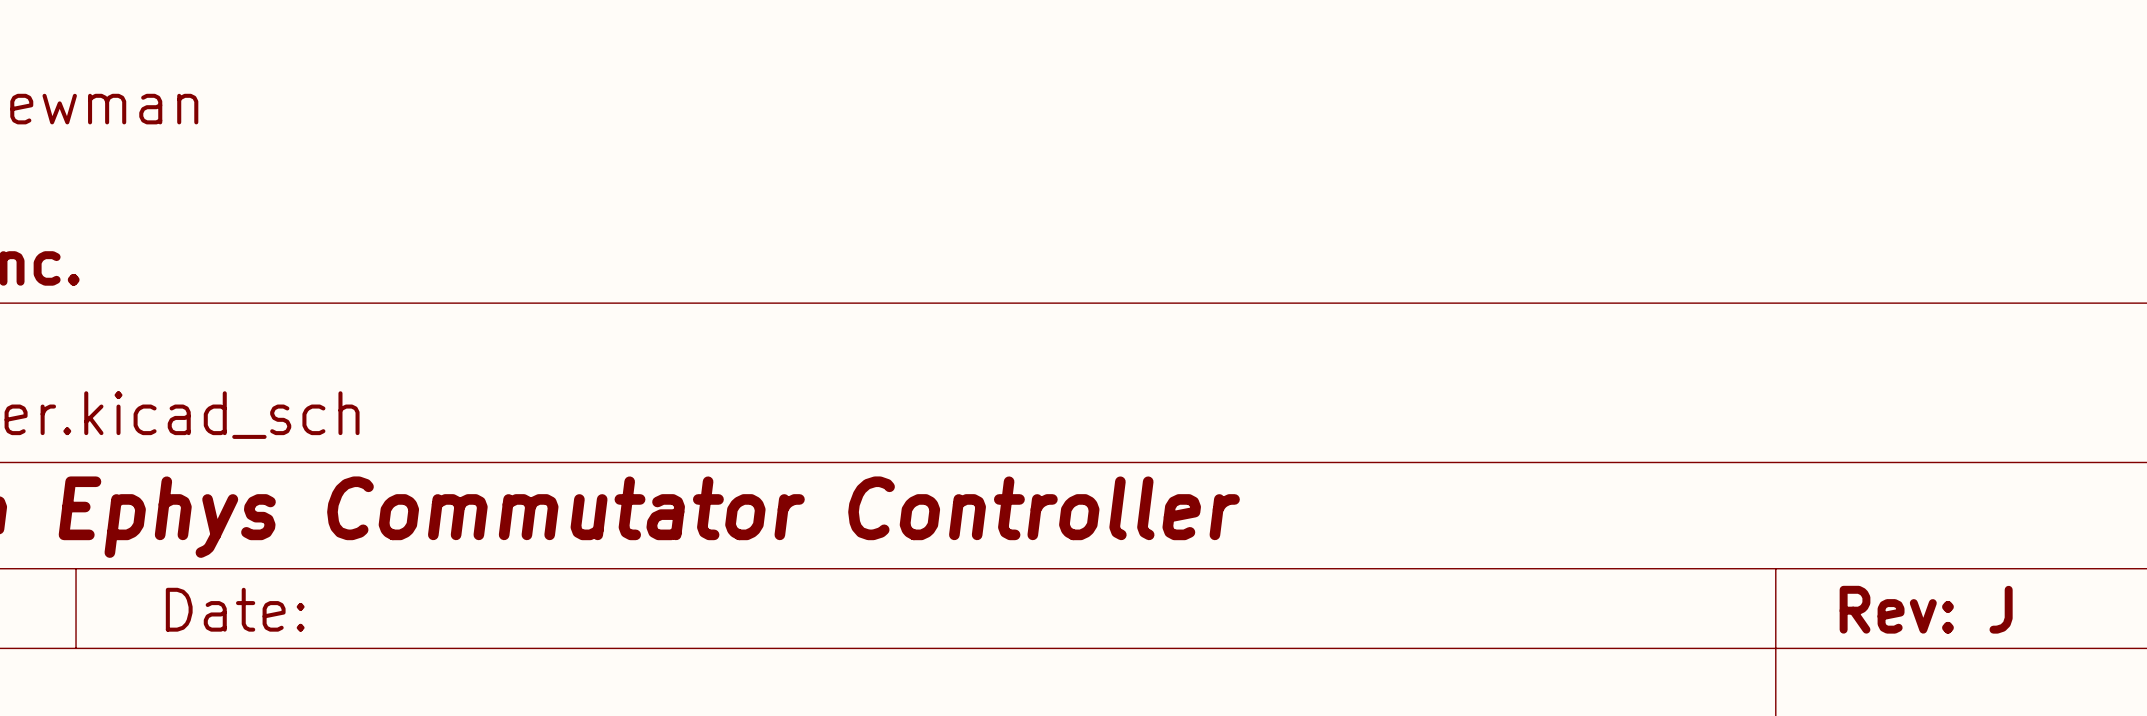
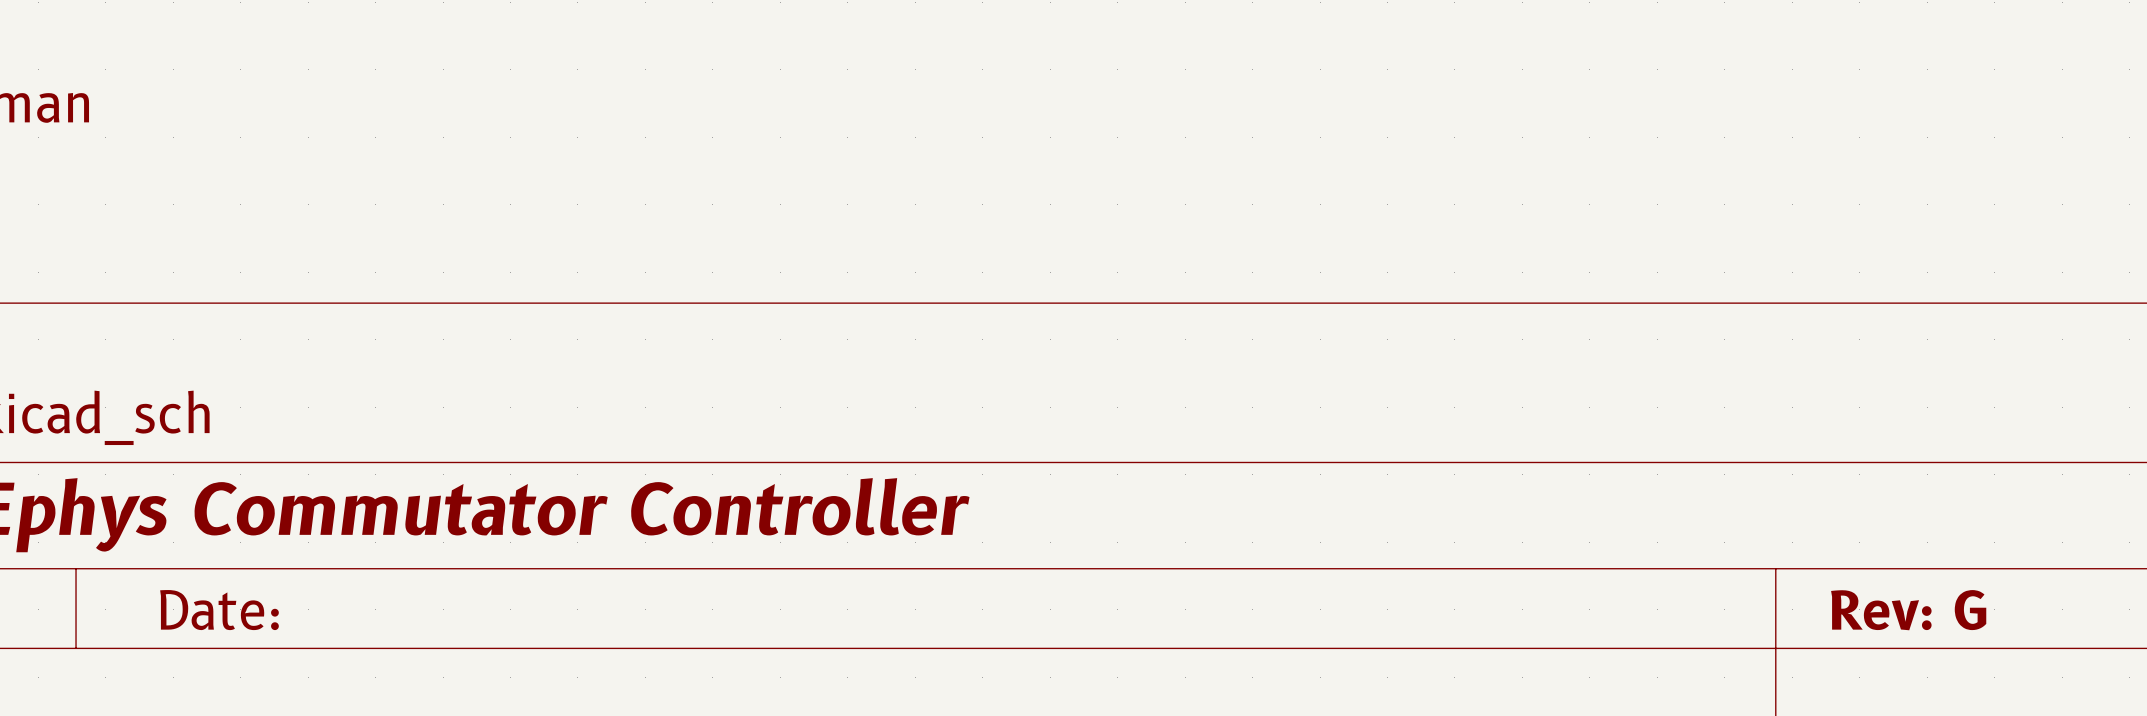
title block: Rev: J (1926, 609) -> Rev: G (1908, 610)

